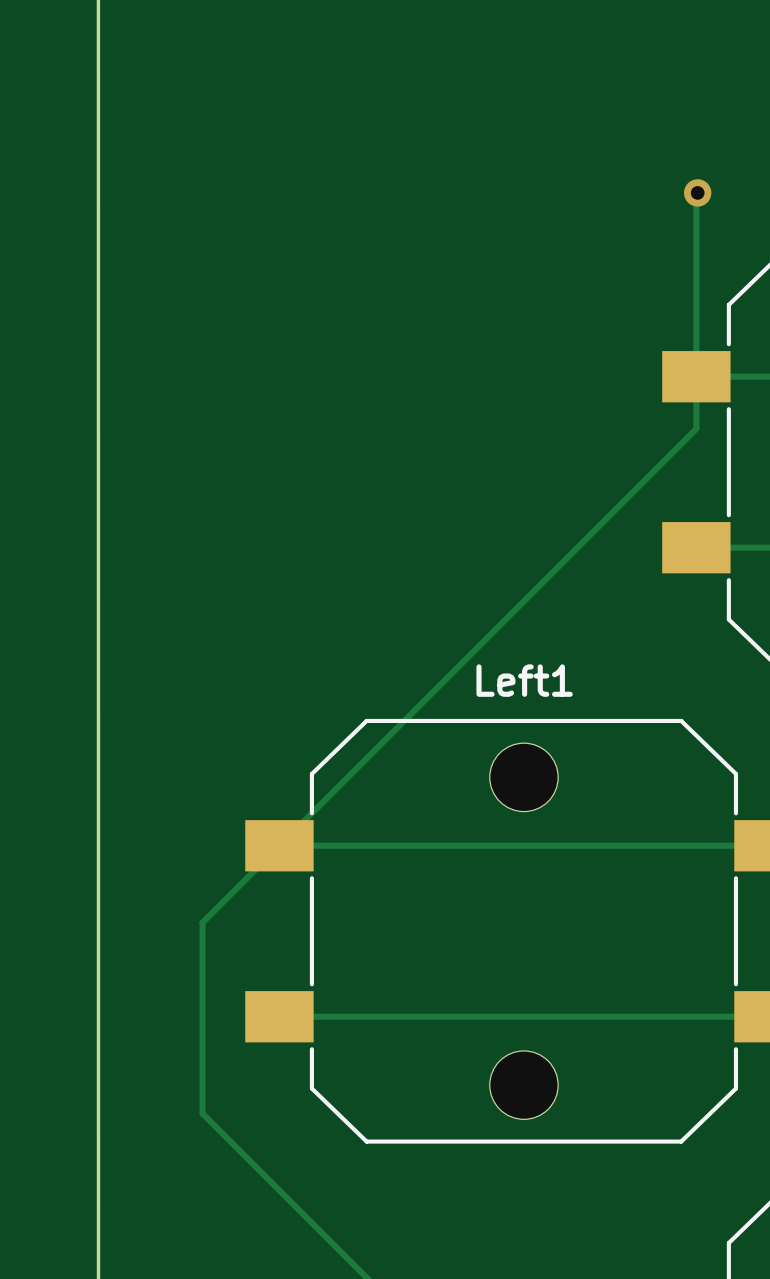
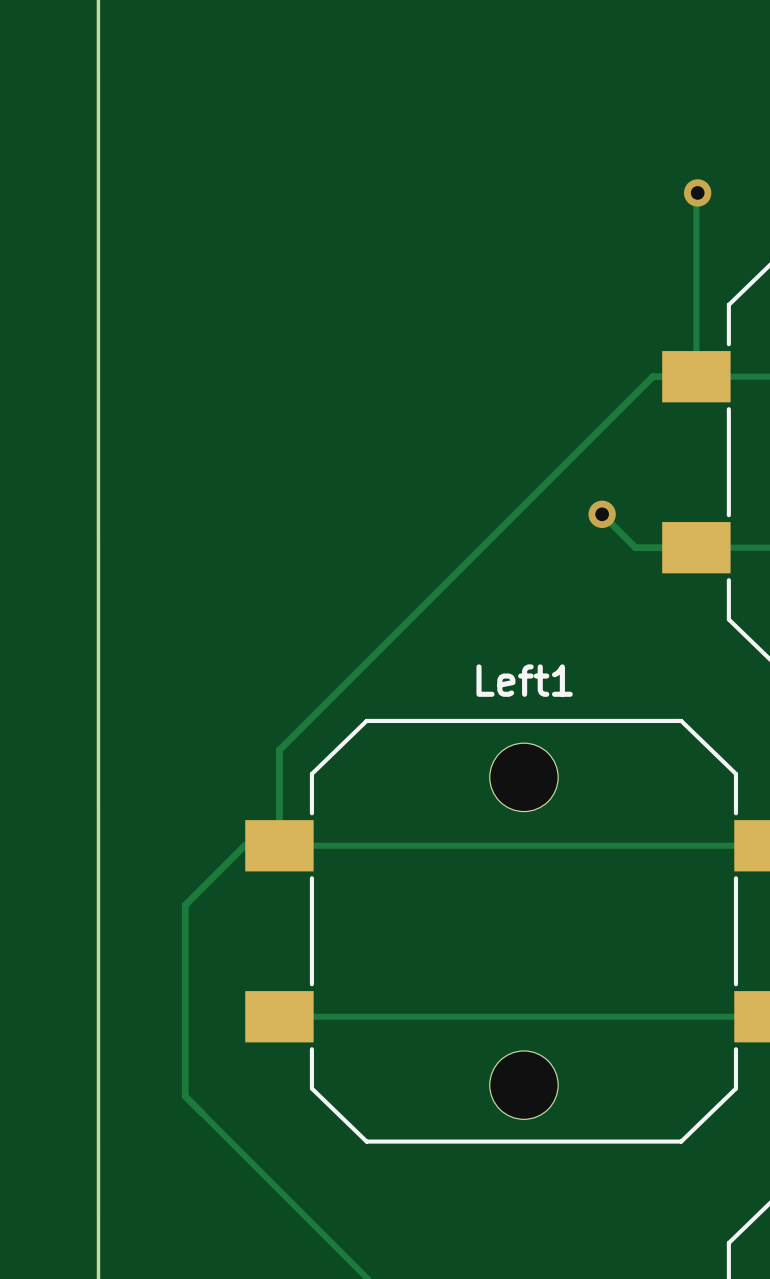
track: (696, 376) (696, 428) (202, 922) (202, 1113) -> (696, 376) (652, 376) (279, 750) (279, 845) (244, 845) (185, 905) (185, 1096) (202, 1113)
track: none -> (602, 514) (635, 547) (696, 547)
via: none -> (602, 514)

